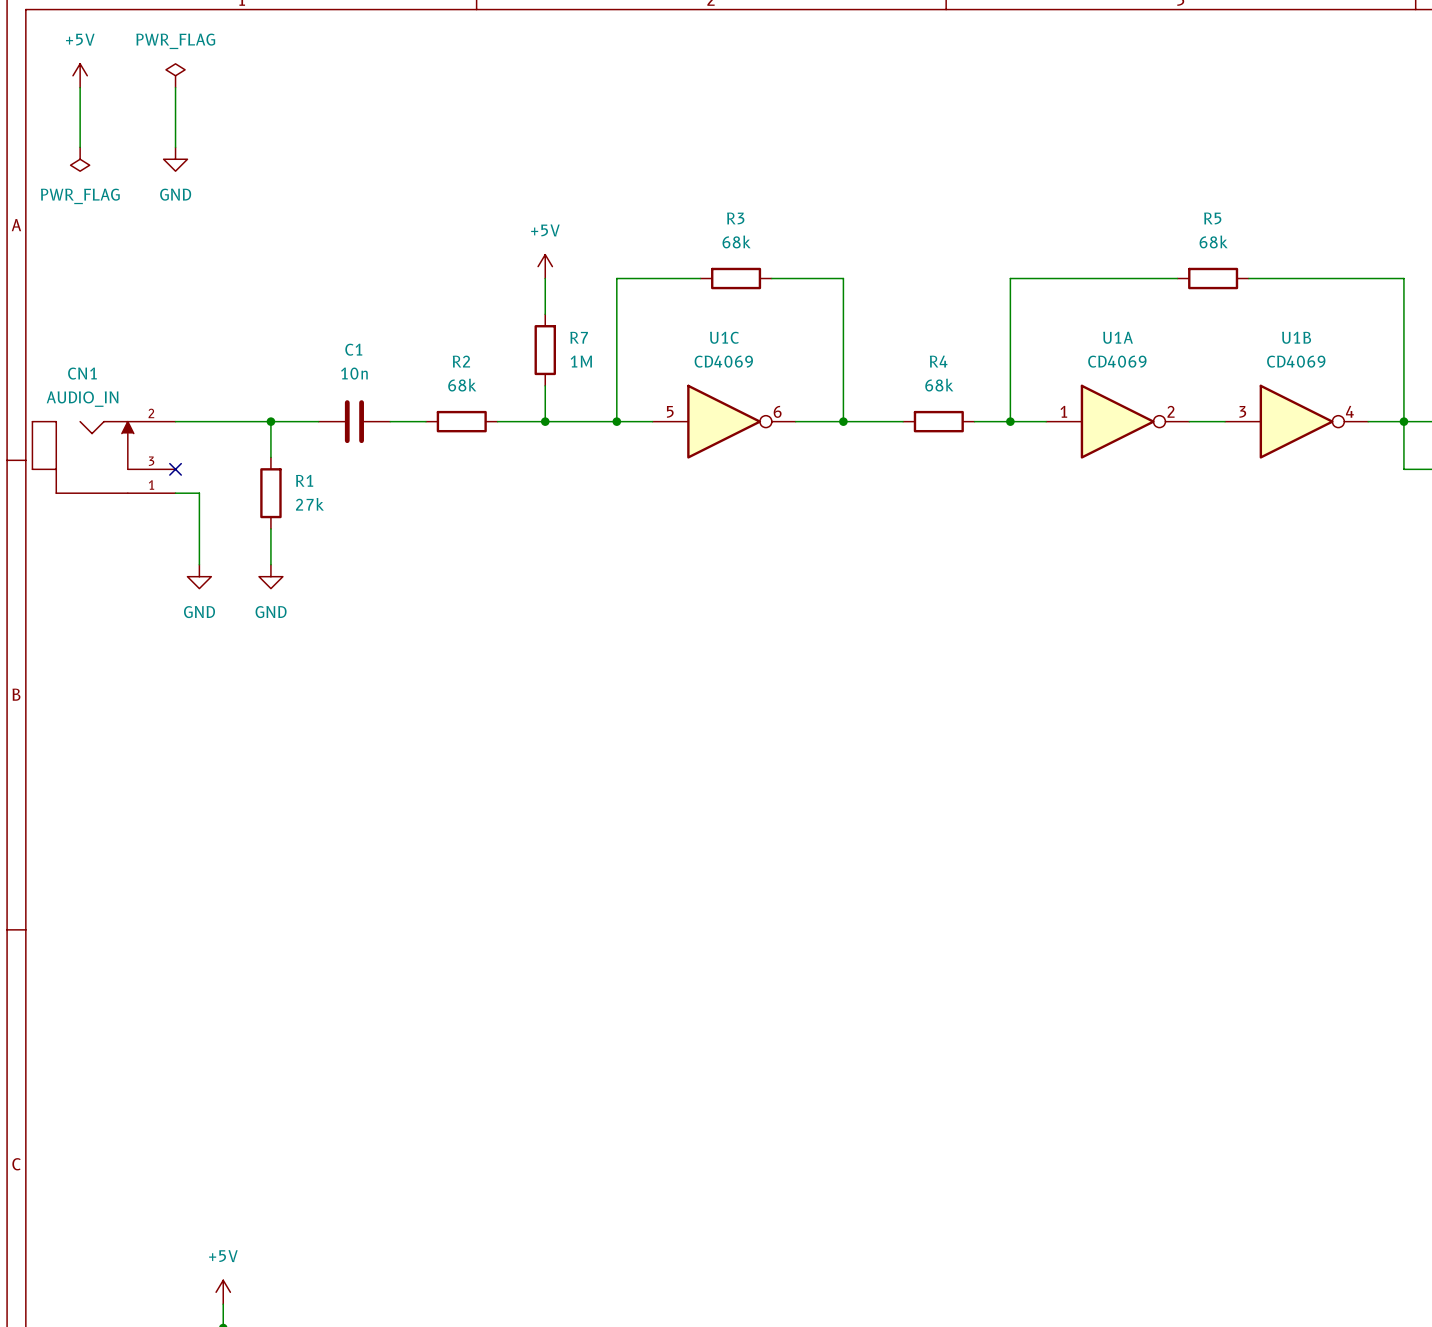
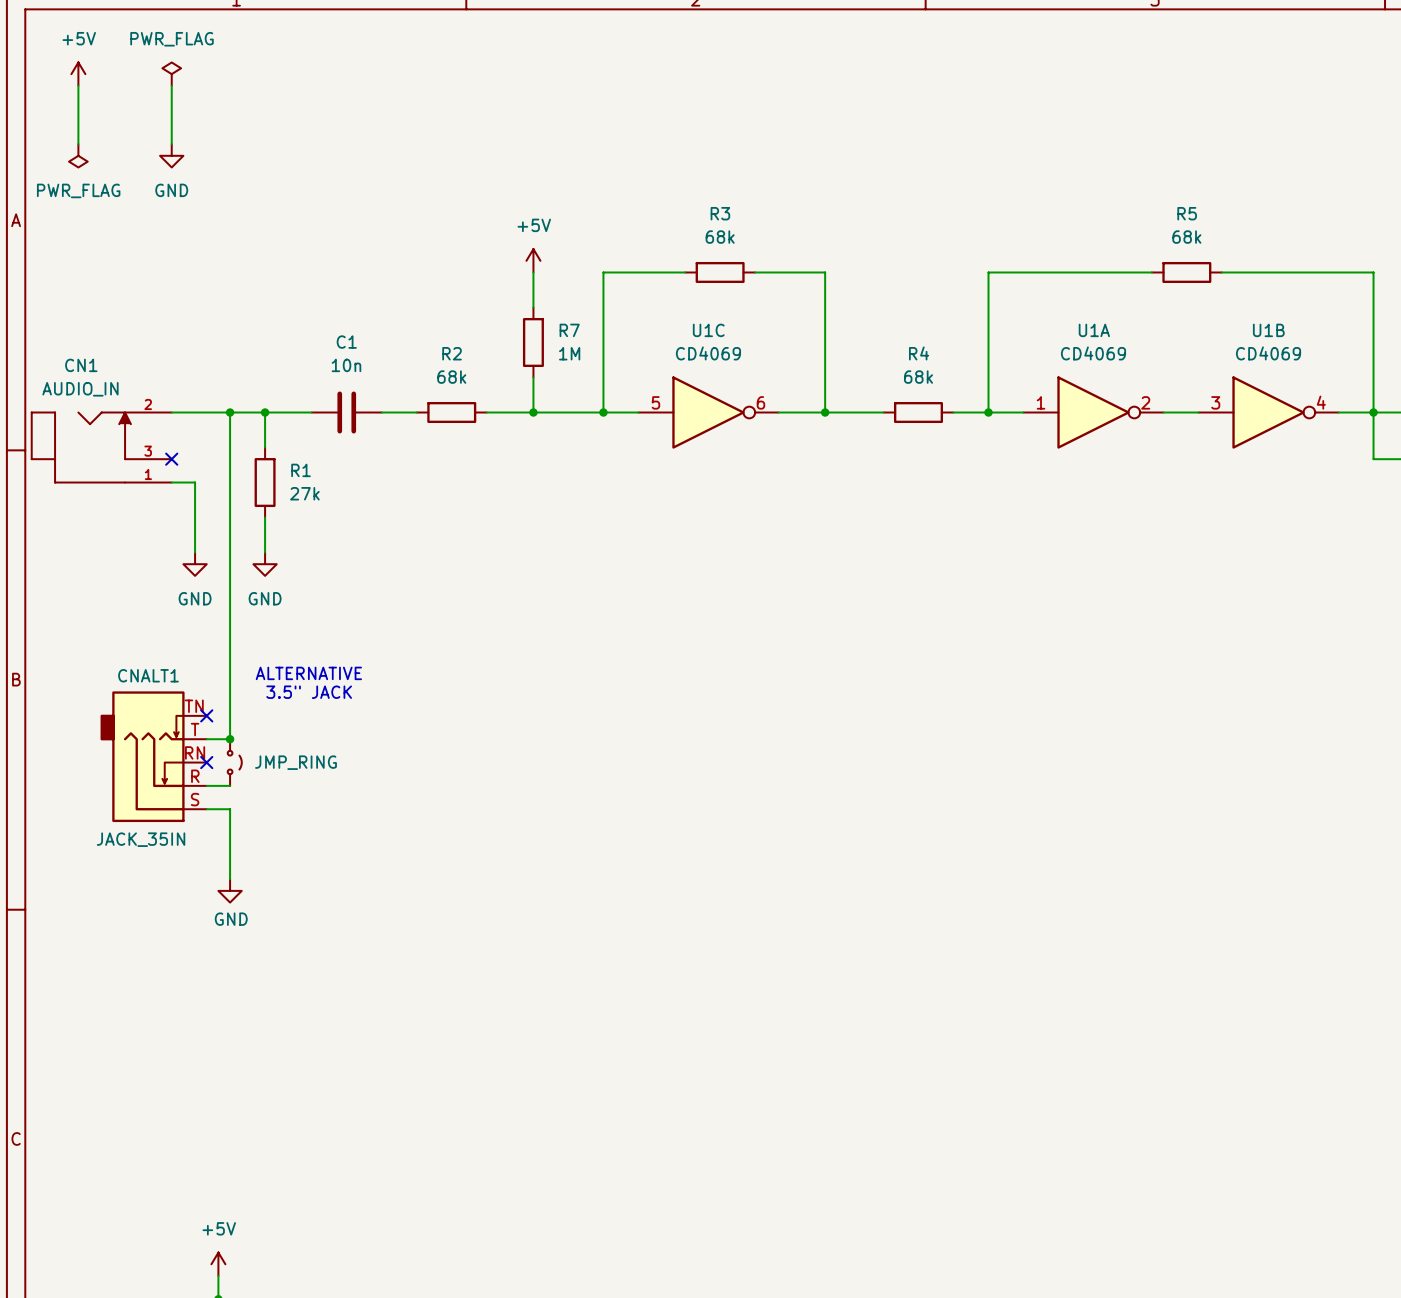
wire: none -> (230, 412) (230, 739) (206, 739)
junction: none -> (230, 412)
text: none -> ALTERNATIVE (308, 673)
text: none -> 3.5" JACK (309, 692)
no-connect mark: none -> (206, 715)
junction: none -> (230, 739)
CNALT1: none -> JACK_35IN (153, 756)
no-connect mark: none -> (206, 762)
part: none -> JMP_RING (234, 762)
wire: none -> (206, 785) (230, 785)
wire: none -> (206, 809) (230, 809) (230, 879)
power symbol: none -> GND (230, 890)

